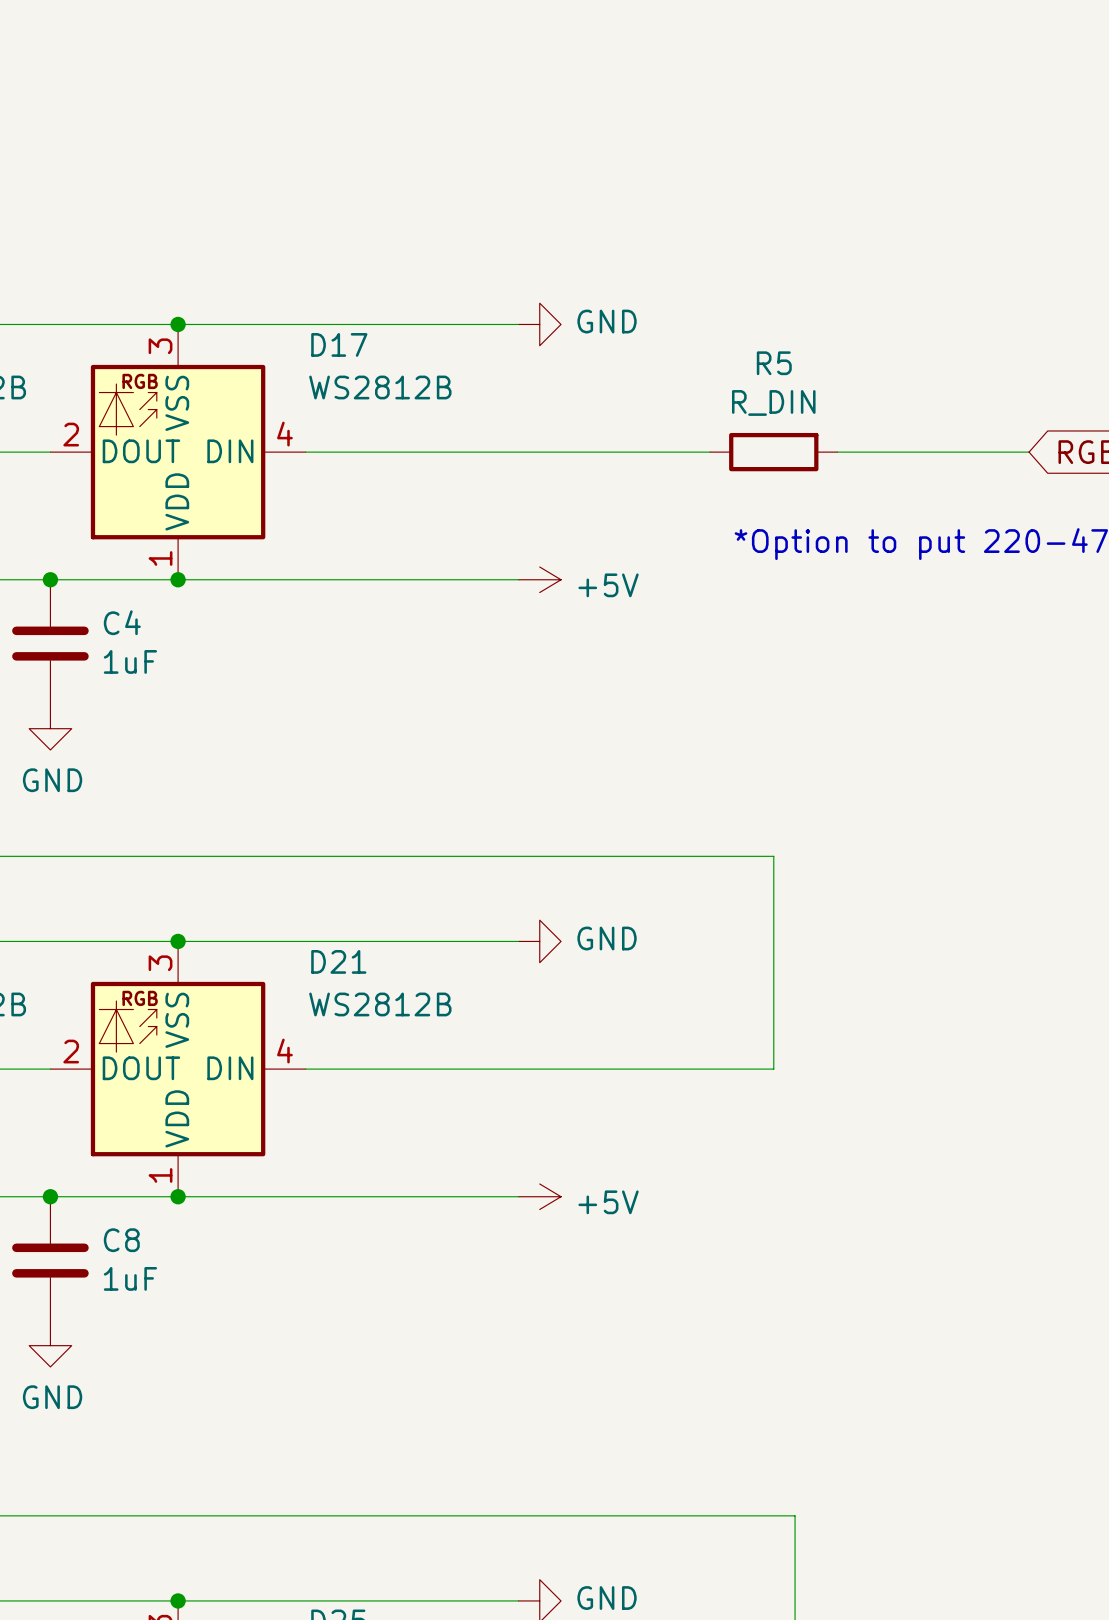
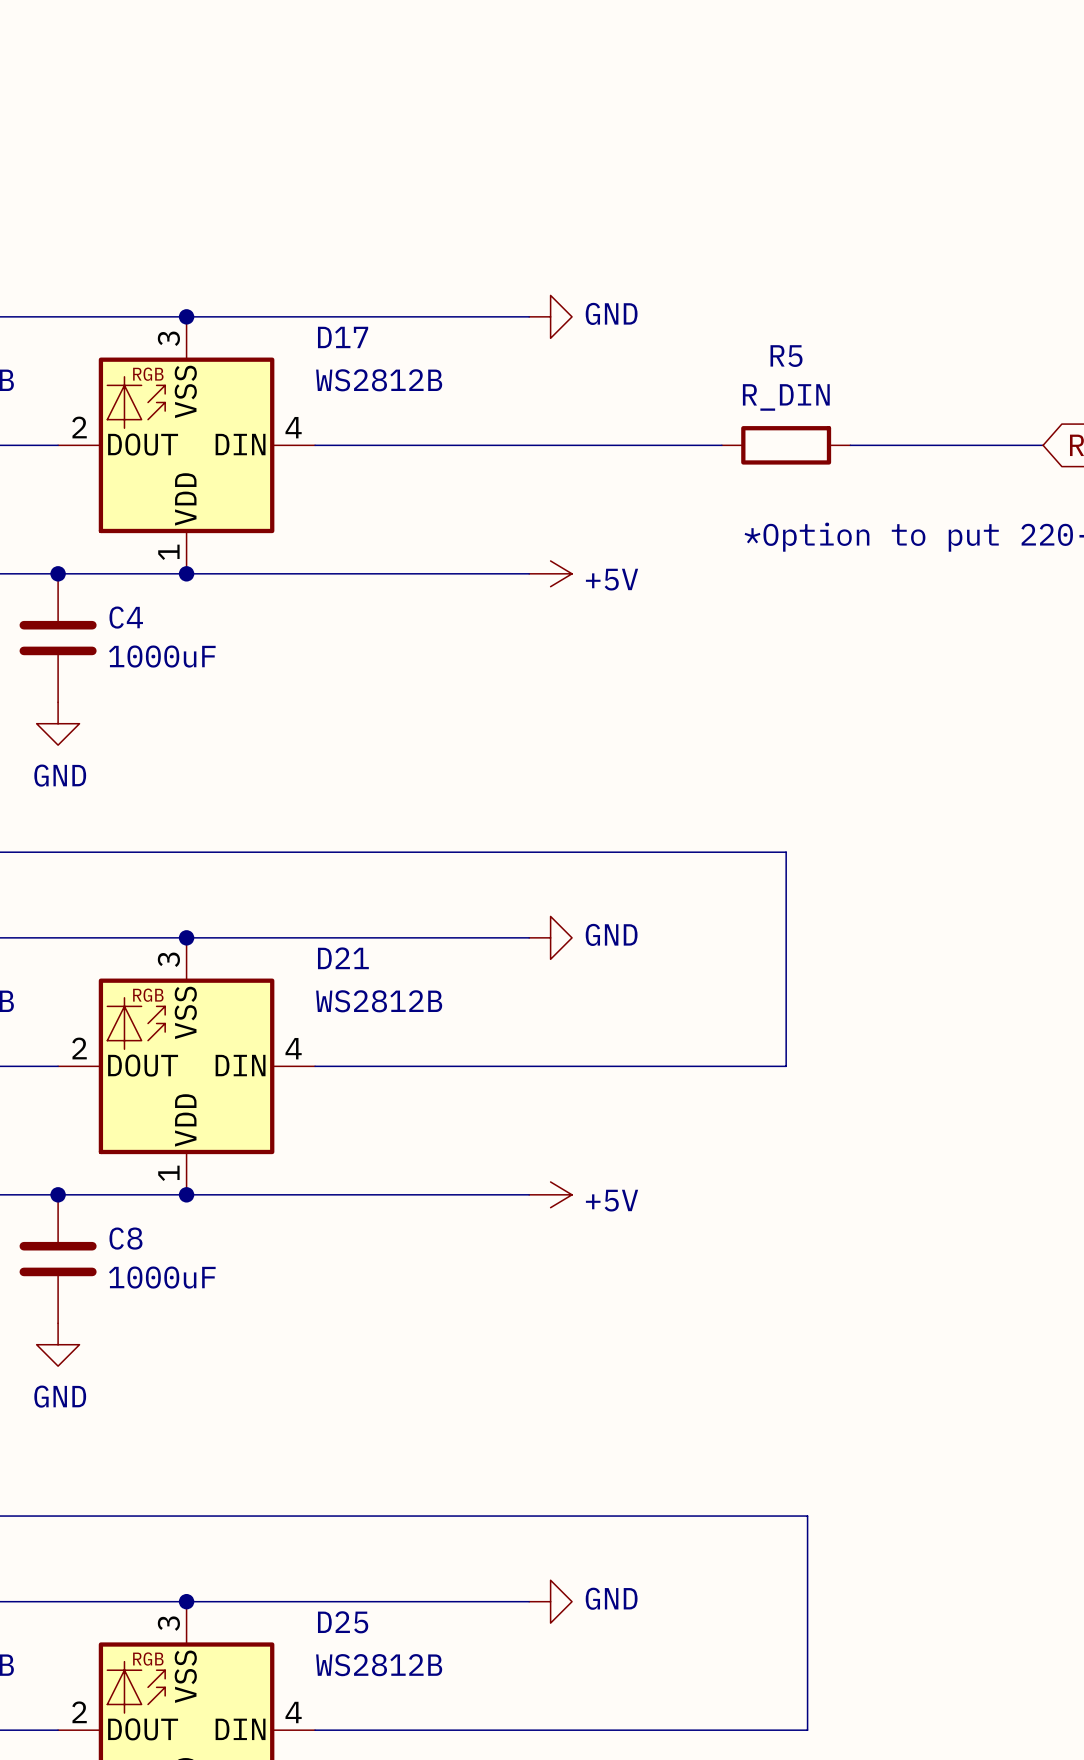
C4 value: 1uF (130, 661) -> 1000uF (162, 656)
C8 value: 1uF (130, 1278) -> 1000uF (162, 1277)

